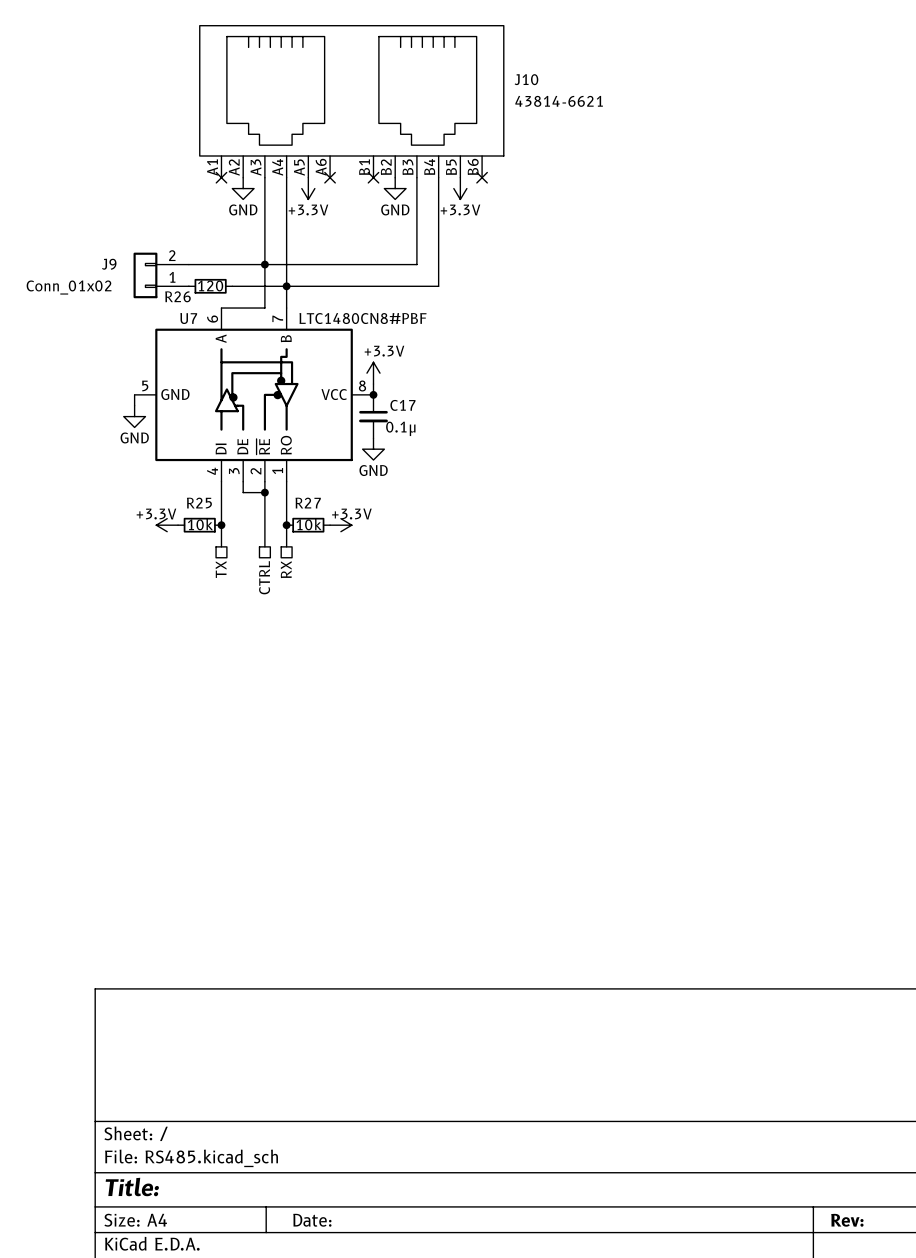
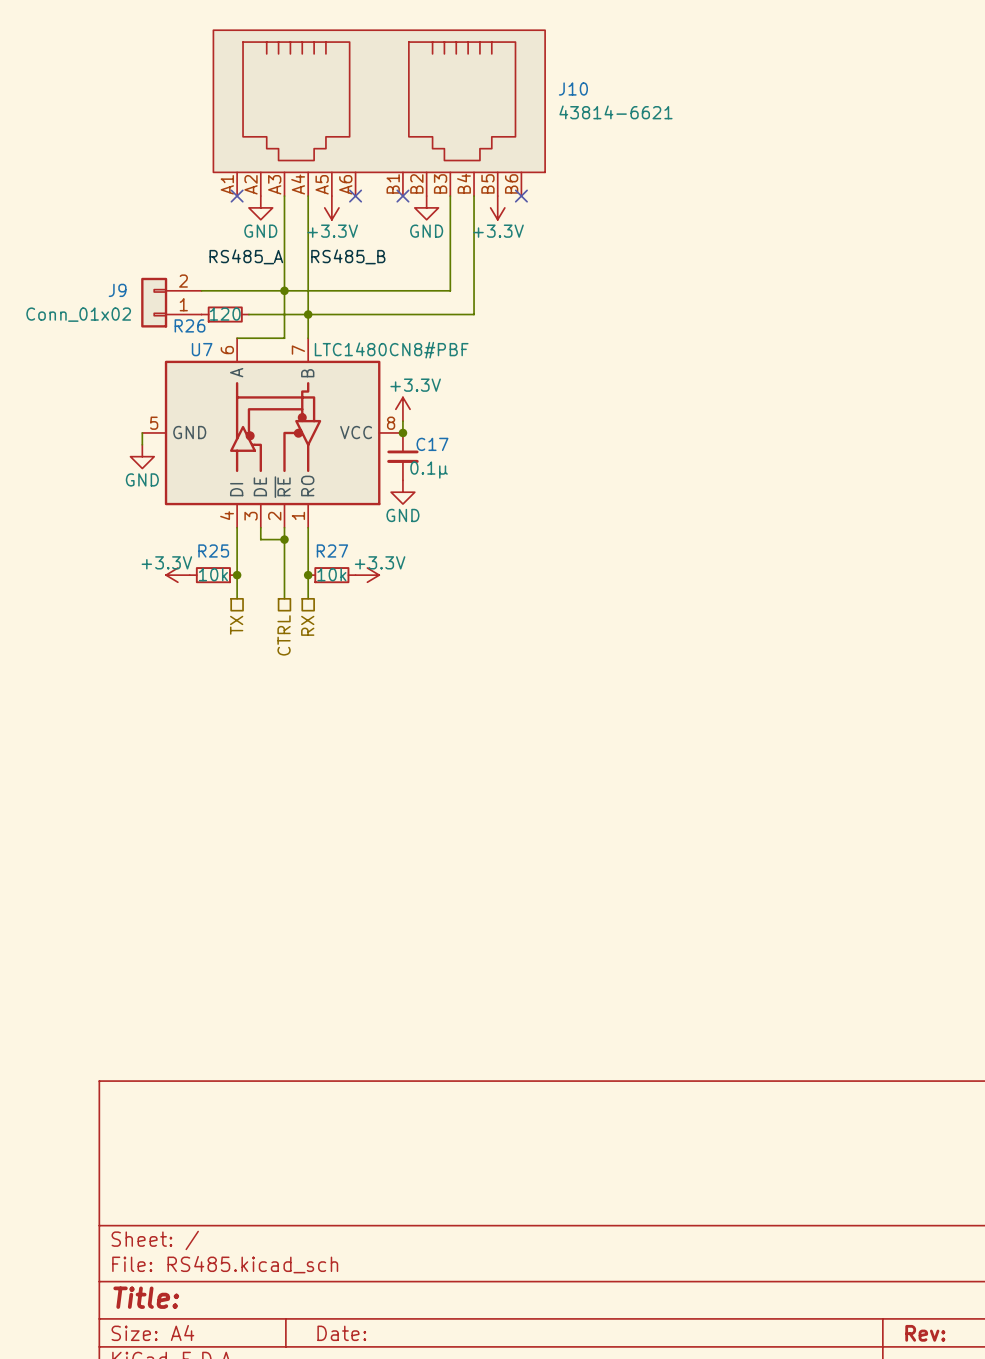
label: none -> RS485_A (246, 256)
label: none -> RS485_B (348, 256)

